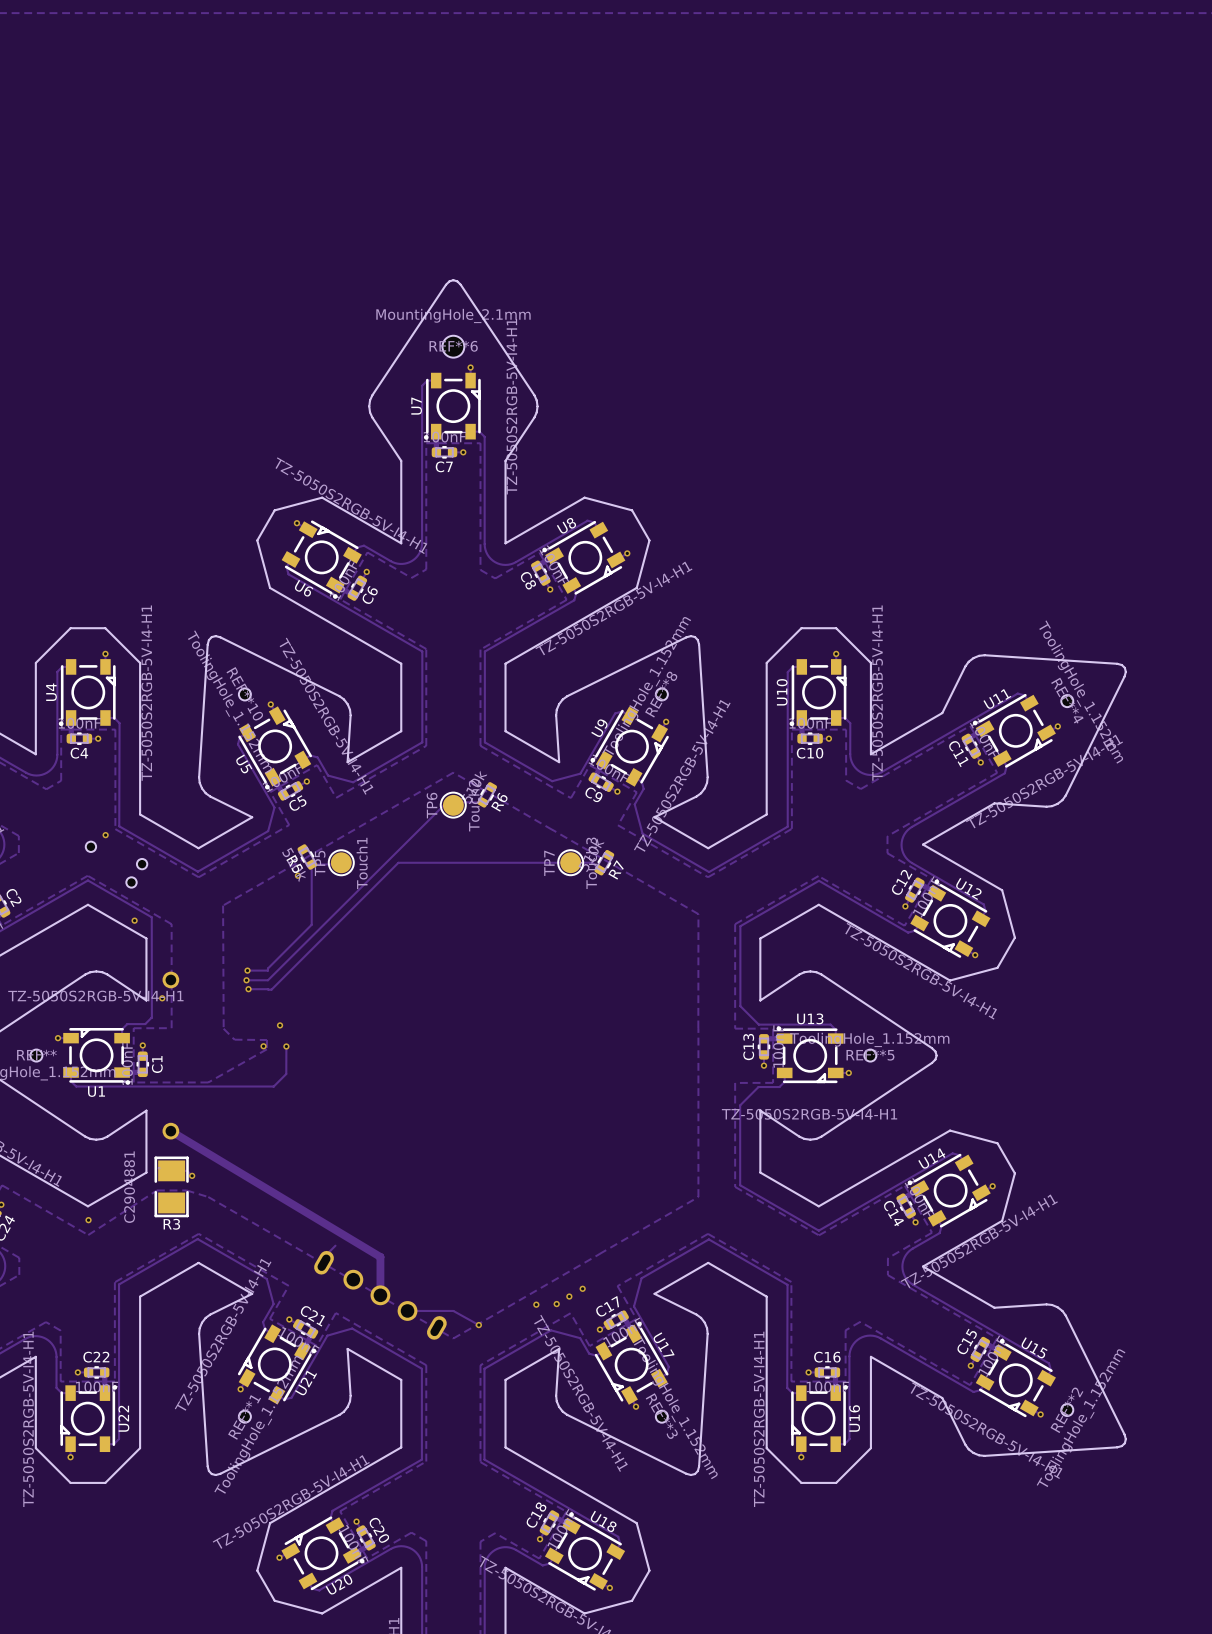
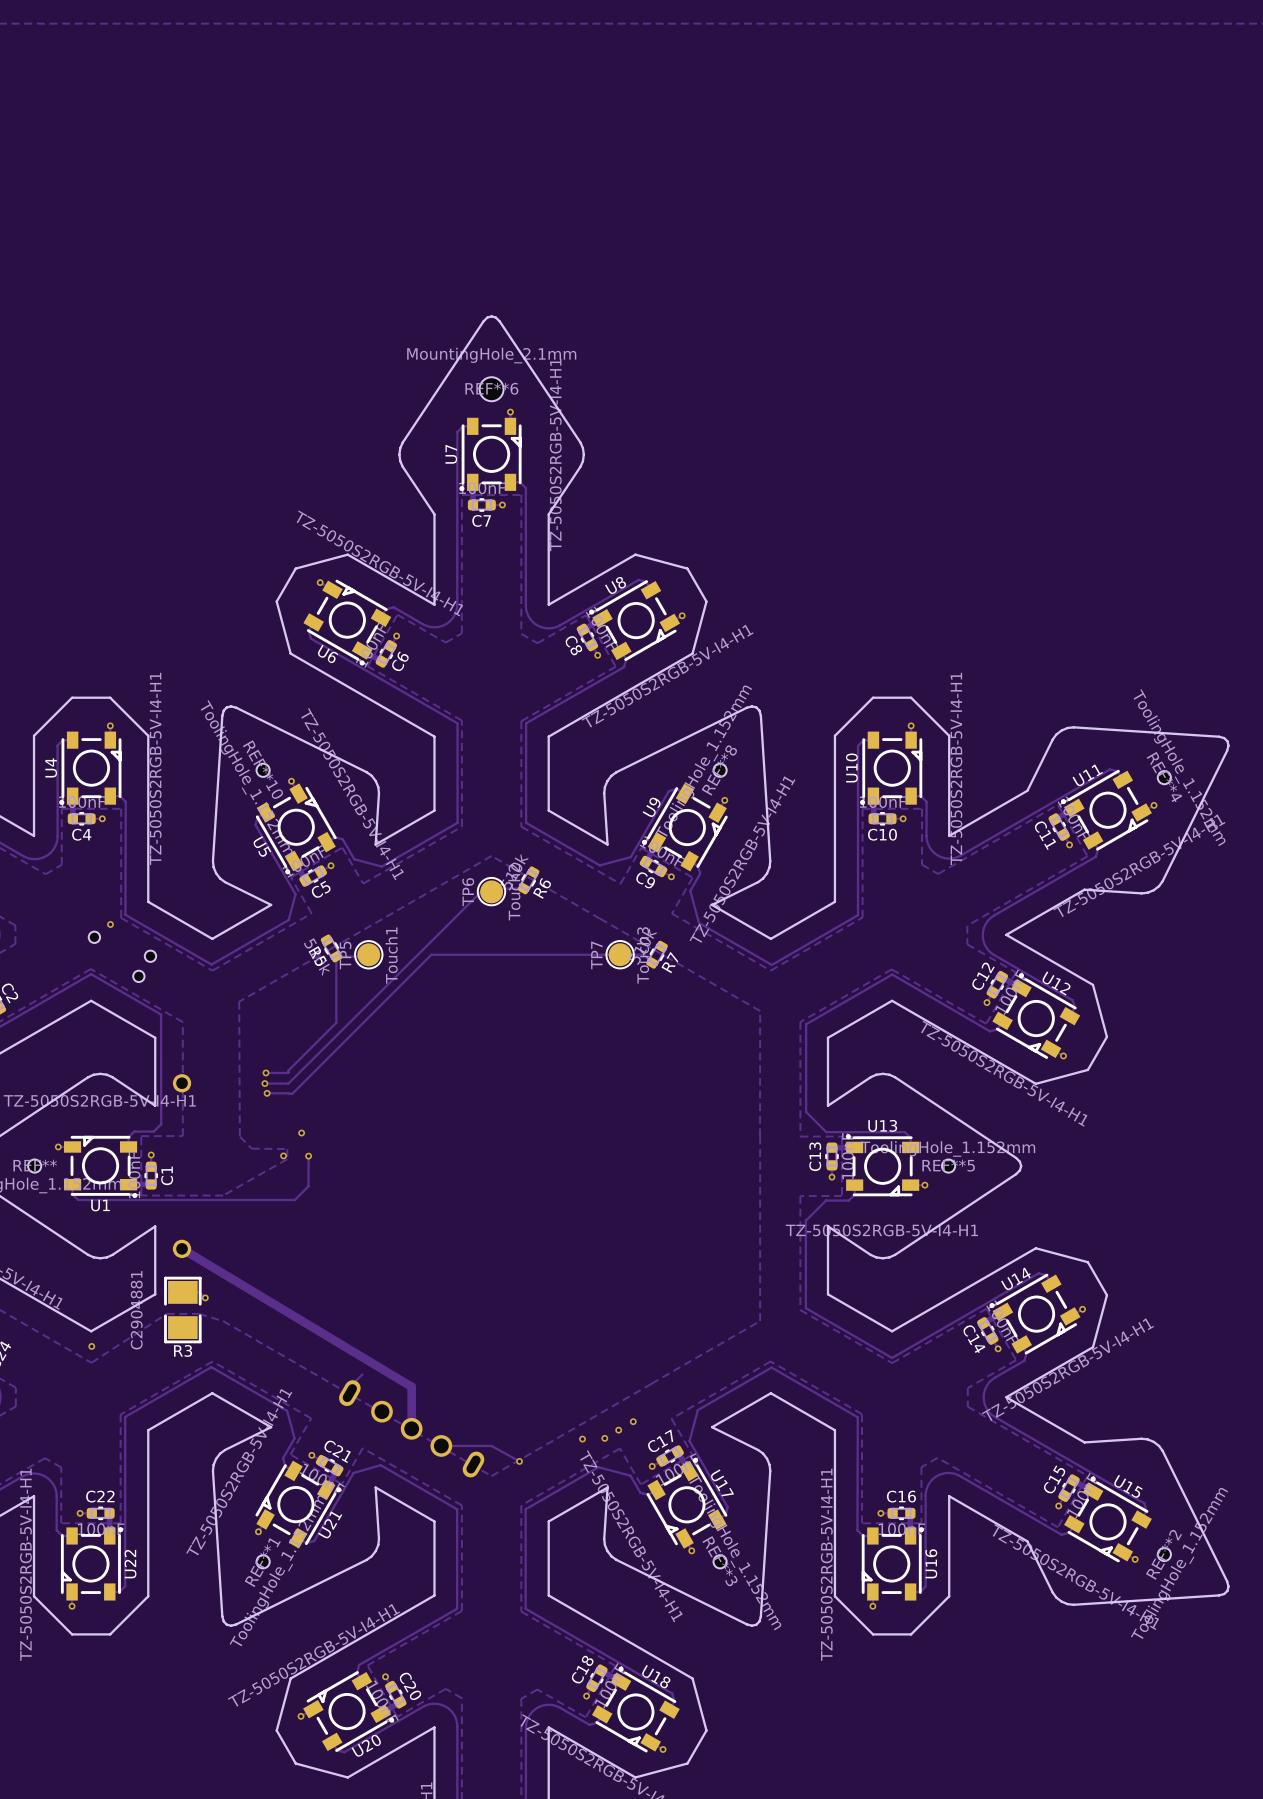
via: (297, 875) -> none
via: (134, 920) -> none
via: (162, 998) -> none

